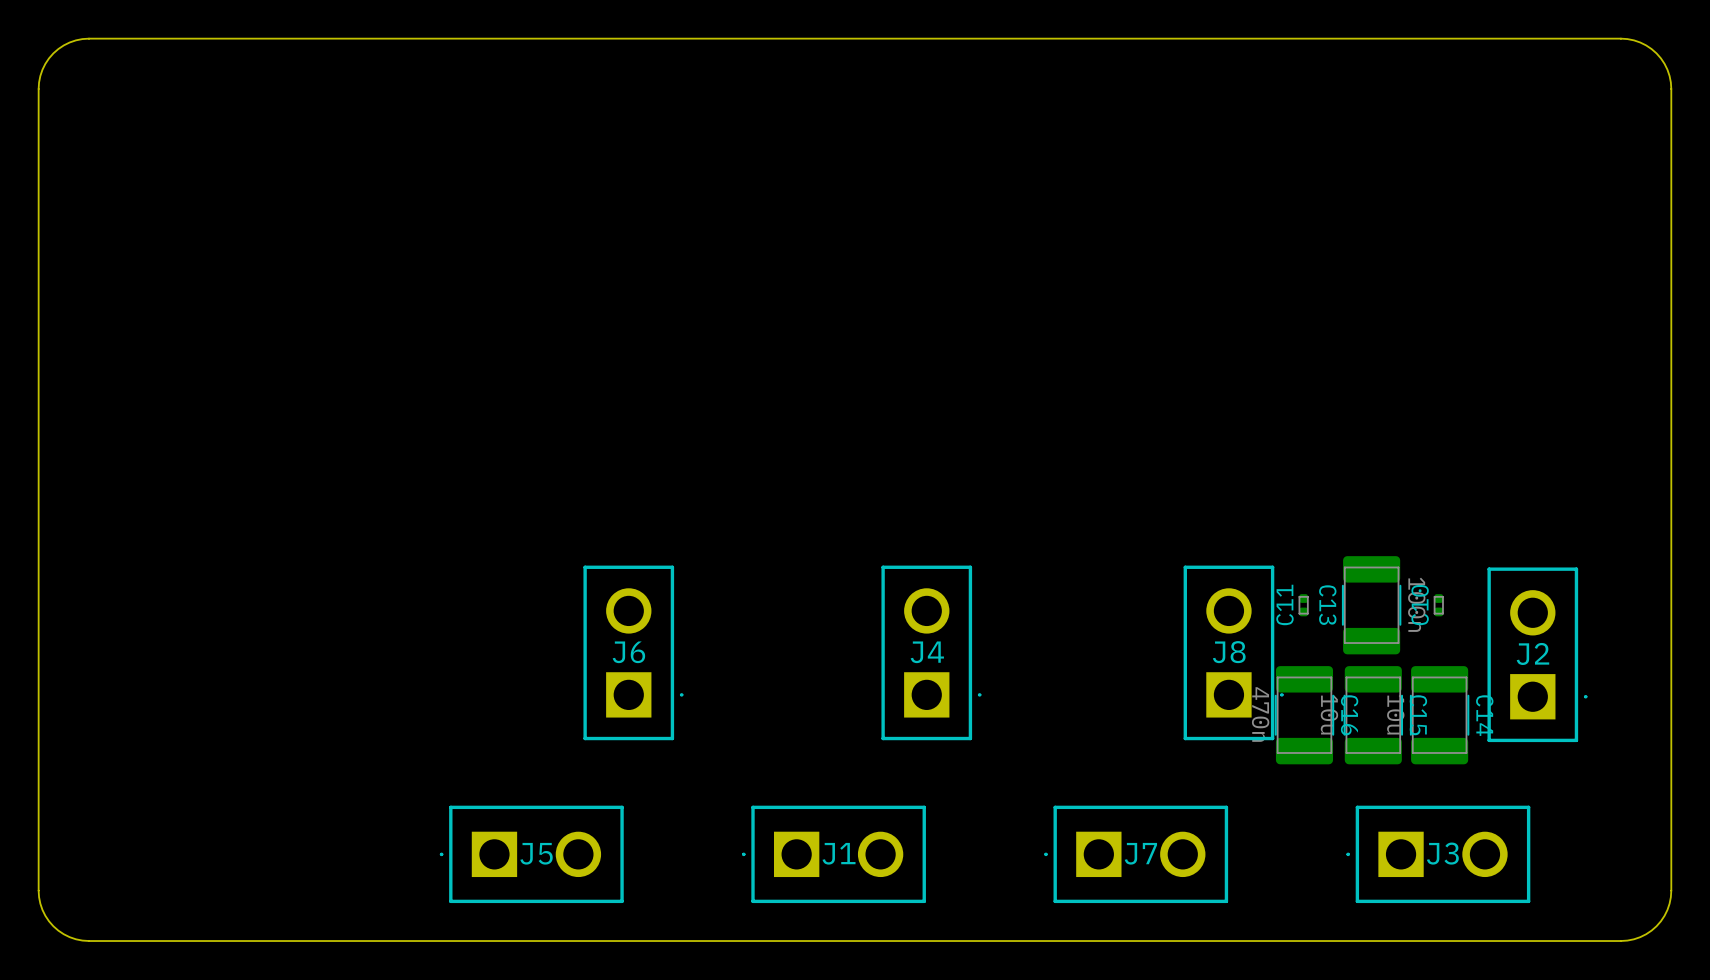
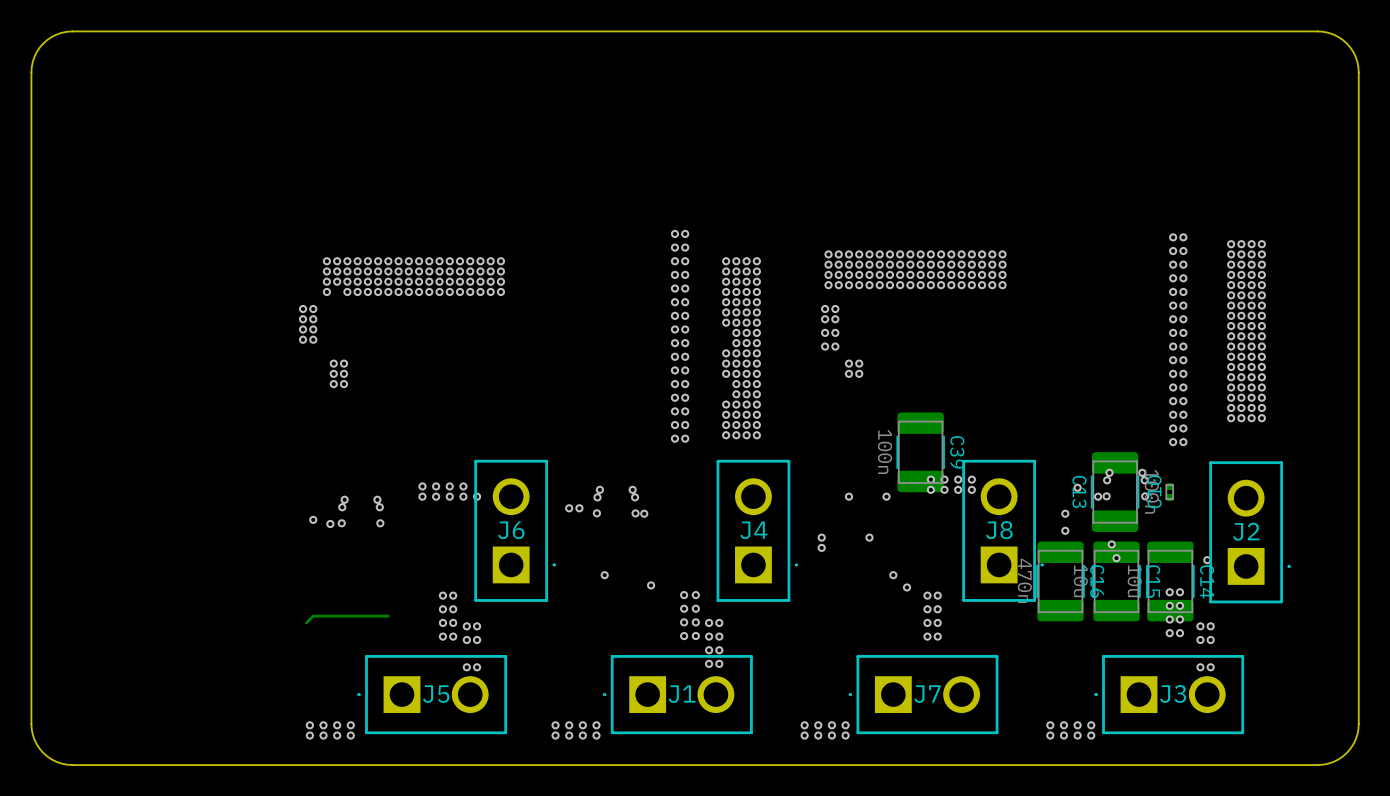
via: none -> (674, 233)
via: none -> (685, 233)
via: none -> (1173, 237)
via: none -> (1183, 237)
via: none -> (1231, 244)
via: none -> (1241, 244)
via: none -> (1251, 244)
via: none -> (1261, 244)
via: none -> (674, 247)
via: none -> (685, 247)
via: none -> (1173, 251)
via: none -> (1183, 251)
via: none -> (828, 254)
via: none -> (838, 254)
via: none -> (848, 254)
via: none -> (859, 254)
via: none -> (869, 254)
via: none -> (879, 254)
via: none -> (889, 254)
via: none -> (900, 254)
via: none -> (910, 254)
via: none -> (920, 254)
via: none -> (930, 254)
via: none -> (941, 254)
via: none -> (951, 254)
via: none -> (961, 254)
via: none -> (971, 254)
via: none -> (982, 254)
via: none -> (992, 254)
via: none -> (1002, 254)
via: none -> (1231, 254)
via: none -> (1241, 254)
via: none -> (1251, 254)
via: none -> (1261, 254)
via: none -> (326, 261)
via: none -> (337, 261)
via: none -> (347, 261)
via: none -> (357, 261)
via: none -> (367, 261)
via: none -> (378, 261)
via: none -> (388, 261)
via: none -> (398, 261)
via: none -> (408, 261)
via: none -> (419, 261)
via: none -> (429, 261)
via: none -> (439, 261)
via: none -> (449, 261)
via: none -> (460, 261)
via: none -> (470, 261)
via: none -> (480, 261)
via: none -> (490, 261)
via: none -> (500, 261)
via: none -> (674, 261)
via: none -> (685, 261)
via: none -> (726, 261)
via: none -> (736, 261)
via: none -> (746, 261)
via: none -> (756, 261)
via: none -> (828, 264)
via: none -> (838, 264)
via: none -> (848, 264)
via: none -> (859, 264)
via: none -> (869, 264)
via: none -> (879, 264)
via: none -> (889, 264)
via: none -> (900, 264)
via: none -> (910, 264)
via: none -> (920, 264)
via: none -> (930, 264)
via: none -> (941, 264)
via: none -> (951, 264)
via: none -> (961, 264)
via: none -> (971, 264)
via: none -> (982, 264)
via: none -> (992, 264)
via: none -> (1002, 264)
via: none -> (1173, 264)
via: none -> (1183, 264)
via: none -> (1231, 264)
via: none -> (1241, 264)
via: none -> (1251, 264)
via: none -> (1261, 264)
via: none -> (326, 271)
via: none -> (337, 271)
via: none -> (347, 271)
via: none -> (357, 271)
via: none -> (367, 271)
via: none -> (378, 271)
via: none -> (388, 271)
via: none -> (398, 271)
via: none -> (408, 271)
via: none -> (419, 271)
via: none -> (429, 271)
via: none -> (439, 271)
via: none -> (449, 271)
via: none -> (460, 271)
via: none -> (470, 271)
via: none -> (480, 271)
via: none -> (490, 271)
via: none -> (500, 271)
via: none -> (726, 271)
via: none -> (736, 271)
via: none -> (746, 271)
via: none -> (756, 271)
via: none -> (674, 274)
via: none -> (685, 274)
via: none -> (828, 274)
via: none -> (838, 274)
via: none -> (848, 274)
via: none -> (859, 274)
via: none -> (869, 274)
via: none -> (879, 274)
via: none -> (889, 274)
via: none -> (900, 274)
via: none -> (910, 274)
via: none -> (920, 274)
via: none -> (930, 274)
via: none -> (941, 274)
via: none -> (951, 274)
via: none -> (961, 274)
via: none -> (971, 274)
via: none -> (982, 274)
via: none -> (992, 274)
via: none -> (1002, 274)
via: none -> (1231, 274)
via: none -> (1241, 274)
via: none -> (1251, 274)
via: none -> (1261, 274)
via: none -> (1173, 278)
via: none -> (1183, 278)
via: none -> (326, 281)
via: none -> (337, 281)
via: none -> (347, 281)
via: none -> (357, 281)
via: none -> (367, 281)
via: none -> (378, 281)
via: none -> (388, 281)
via: none -> (398, 281)
via: none -> (408, 281)
via: none -> (419, 281)
via: none -> (429, 281)
via: none -> (439, 281)
via: none -> (449, 281)
via: none -> (460, 281)
via: none -> (470, 281)
via: none -> (480, 281)
via: none -> (490, 281)
via: none -> (500, 281)
via: none -> (726, 281)
via: none -> (736, 281)
via: none -> (746, 281)
via: none -> (756, 281)
via: none -> (828, 285)
via: none -> (838, 285)
via: none -> (848, 285)
via: none -> (859, 285)
via: none -> (869, 285)
via: none -> (879, 285)
via: none -> (889, 285)
via: none -> (900, 285)
via: none -> (910, 285)
via: none -> (920, 285)
via: none -> (930, 285)
via: none -> (941, 285)
via: none -> (951, 285)
via: none -> (961, 285)
via: none -> (971, 285)
via: none -> (982, 285)
via: none -> (992, 285)
via: none -> (1002, 285)
via: none -> (1231, 285)
via: none -> (1241, 285)
via: none -> (1251, 285)
via: none -> (1261, 285)
via: none -> (674, 288)
via: none -> (685, 288)
via: none -> (326, 291)
via: none -> (347, 291)
via: none -> (357, 291)
via: none -> (367, 291)
via: none -> (378, 291)
via: none -> (388, 291)
via: none -> (398, 291)
via: none -> (408, 291)
via: none -> (419, 291)
via: none -> (429, 291)
via: none -> (439, 291)
via: none -> (449, 291)
via: none -> (460, 291)
via: none -> (470, 291)
via: none -> (480, 291)
via: none -> (490, 291)
via: none -> (500, 291)
via: none -> (726, 291)
via: none -> (736, 291)
via: none -> (746, 291)
via: none -> (756, 291)
via: none -> (1173, 291)
via: none -> (1183, 291)
via: none -> (1231, 295)
via: none -> (1241, 295)
via: none -> (1251, 295)
via: none -> (1261, 295)
via: none -> (674, 302)
via: none -> (685, 302)
via: none -> (726, 302)
via: none -> (736, 302)
via: none -> (746, 302)
via: none -> (756, 302)
via: none -> (1173, 305)
via: none -> (1183, 305)
via: none -> (1231, 305)
via: none -> (1241, 305)
via: none -> (1251, 305)
via: none -> (1261, 305)
via: none -> (303, 309)
via: none -> (313, 309)
via: none -> (825, 309)
via: none -> (835, 309)
via: none -> (726, 312)
via: none -> (736, 312)
via: none -> (746, 312)
via: none -> (756, 312)
via: none -> (674, 315)
via: none -> (685, 315)
via: none -> (1231, 315)
via: none -> (1241, 315)
via: none -> (1251, 315)
via: none -> (1261, 315)
via: none -> (303, 319)
via: none -> (313, 319)
via: none -> (825, 319)
via: none -> (835, 319)
via: none -> (1173, 319)
via: none -> (1183, 319)
via: none -> (726, 322)
via: none -> (736, 322)
via: none -> (746, 322)
via: none -> (756, 322)
via: none -> (1231, 326)
via: none -> (1241, 326)
via: none -> (1251, 326)
via: none -> (1261, 326)
via: none -> (303, 329)
via: none -> (313, 329)
via: none -> (674, 329)
via: none -> (685, 329)
via: none -> (736, 332)
via: none -> (746, 332)
via: none -> (756, 332)
via: none -> (825, 332)
via: none -> (835, 332)
via: none -> (1173, 332)
via: none -> (1183, 332)
via: none -> (1231, 336)
via: none -> (1241, 336)
via: none -> (1251, 336)
via: none -> (1261, 336)
via: none -> (303, 339)
via: none -> (313, 339)
via: none -> (674, 343)
via: none -> (685, 343)
via: none -> (736, 343)
via: none -> (746, 343)
via: none -> (756, 343)
via: none -> (825, 346)
via: none -> (835, 346)
via: none -> (1173, 346)
via: none -> (1183, 346)
via: none -> (1231, 346)
via: none -> (1241, 346)
via: none -> (1251, 346)
via: none -> (1261, 346)
via: none -> (726, 353)
via: none -> (736, 353)
via: none -> (746, 353)
via: none -> (756, 353)
via: none -> (674, 356)
via: none -> (685, 356)
via: none -> (1231, 356)
via: none -> (1241, 356)
via: none -> (1251, 356)
via: none -> (1261, 356)
via: none -> (1173, 360)
via: none -> (1183, 360)
via: none -> (333, 363)
via: none -> (343, 363)
via: none -> (726, 363)
via: none -> (736, 363)
via: none -> (746, 363)
via: none -> (756, 363)
via: none -> (848, 363)
via: none -> (859, 363)
via: none -> (1231, 367)
via: none -> (1241, 367)
via: none -> (1251, 367)
via: none -> (1261, 367)
via: none -> (674, 370)
via: none -> (685, 370)
via: none -> (333, 373)
via: none -> (343, 373)
via: none -> (726, 373)
via: none -> (736, 373)
via: none -> (746, 373)
via: none -> (756, 373)
via: none -> (848, 373)
via: none -> (859, 373)
via: none -> (1173, 373)
via: none -> (1183, 373)
via: none -> (1231, 377)
via: none -> (1241, 377)
via: none -> (1251, 377)
via: none -> (1261, 377)
via: none -> (333, 384)
via: none -> (343, 384)
via: none -> (674, 384)
via: none -> (685, 384)
via: none -> (736, 384)
via: none -> (746, 384)
via: none -> (756, 384)
via: none -> (1173, 387)
via: none -> (1183, 387)
via: none -> (1231, 387)
via: none -> (1241, 387)
via: none -> (1251, 387)
via: none -> (1261, 387)
via: none -> (736, 394)
via: none -> (746, 394)
via: none -> (756, 394)
via: none -> (674, 397)
via: none -> (685, 397)
via: none -> (1231, 397)
via: none -> (1241, 397)
via: none -> (1251, 397)
via: none -> (1261, 397)
via: none -> (1173, 401)
via: none -> (1183, 401)
via: none -> (726, 404)
via: none -> (736, 404)
via: none -> (746, 404)
via: none -> (756, 404)
via: none -> (1231, 407)
via: none -> (1241, 407)
via: none -> (1251, 407)
via: none -> (1261, 407)
via: none -> (674, 411)
via: none -> (685, 411)
via: none -> (726, 414)
via: none -> (736, 414)
via: none -> (746, 414)
via: none -> (756, 414)
via: none -> (1173, 414)
via: none -> (1183, 414)
via: none -> (1231, 418)
via: none -> (1241, 418)
via: none -> (1251, 418)
via: none -> (1261, 418)
via: none -> (674, 425)
via: none -> (685, 425)
via: none -> (726, 425)
via: none -> (736, 425)
via: none -> (746, 425)
via: none -> (756, 425)
via: none -> (1173, 428)
via: none -> (1183, 428)
via: none -> (726, 435)
via: none -> (736, 435)
via: none -> (746, 435)
via: none -> (756, 435)
via: none -> (674, 438)
via: none -> (685, 438)
via: none -> (1173, 442)
via: none -> (1183, 442)
C39: none -> 100n (920, 452)
via: none -> (1109, 472)
via: none -> (1142, 472)
via: none -> (930, 479)
via: none -> (944, 479)
via: none -> (958, 479)
via: none -> (971, 479)
via: none -> (1107, 480)
via: none -> (1144, 480)
via: none -> (422, 486)
via: none -> (436, 486)
via: none -> (449, 486)
via: none -> (463, 486)
via: none -> (1077, 487)
via: none -> (599, 489)
via: none -> (632, 489)
via: none -> (930, 489)
via: none -> (944, 489)
via: none -> (958, 489)
via: none -> (971, 489)
C11: (1303, 605) -> none
via: none -> (422, 496)
via: none -> (436, 496)
via: none -> (449, 496)
via: none -> (463, 496)
via: none -> (477, 496)
via: none -> (848, 496)
via: none -> (886, 496)
via: none -> (1098, 496)
via: none -> (1106, 496)
via: none -> (1145, 496)
via: none -> (597, 497)
via: none -> (635, 497)
via: none -> (344, 499)
via: none -> (377, 499)
via: none -> (342, 507)
via: none -> (379, 507)
via: none -> (569, 508)
via: none -> (579, 508)
via: none -> (596, 513)
via: none -> (635, 513)
via: none -> (644, 513)
via: none -> (1065, 513)
via: none -> (313, 519)
via: none -> (341, 523)
via: none -> (380, 523)
via: none -> (330, 523)
via: none -> (1065, 530)
via: none -> (821, 537)
via: none -> (869, 537)
via: none -> (1111, 544)
via: none -> (821, 547)
via: none -> (1116, 558)
via: none -> (1207, 560)
via: none -> (604, 575)
via: none -> (893, 575)
via: none -> (651, 585)
via: none -> (906, 587)
via: none -> (1169, 592)
via: none -> (1179, 592)
via: none -> (684, 595)
via: none -> (695, 595)
via: none -> (442, 595)
via: none -> (453, 595)
via: none -> (927, 595)
via: none -> (937, 595)
via: none -> (1169, 605)
via: none -> (1179, 605)
via: none -> (684, 608)
via: none -> (695, 608)
via: none -> (442, 609)
via: none -> (453, 609)
via: none -> (927, 609)
via: none -> (937, 609)
track: none -> (388, 616) (313, 616) (306, 622)
via: none -> (1169, 619)
via: none -> (1179, 619)
via: none -> (684, 622)
via: none -> (695, 622)
via: none -> (442, 622)
via: none -> (453, 622)
via: none -> (709, 622)
via: none -> (719, 622)
via: none -> (927, 622)
via: none -> (937, 622)
via: none -> (466, 626)
via: none -> (477, 626)
via: none -> (1200, 626)
via: none -> (1210, 626)
via: none -> (1169, 633)
via: none -> (1179, 633)
via: none -> (684, 636)
via: none -> (695, 636)
via: none -> (442, 636)
via: none -> (453, 636)
via: none -> (709, 636)
via: none -> (719, 636)
via: none -> (927, 636)
via: none -> (937, 636)
via: none -> (466, 640)
via: none -> (477, 640)
via: none -> (1200, 640)
via: none -> (1210, 640)
via: none -> (709, 650)
via: none -> (719, 650)
via: none -> (709, 663)
via: none -> (719, 663)
via: none -> (466, 667)
via: none -> (477, 667)
via: none -> (1200, 667)
via: none -> (1210, 667)
via: none -> (309, 725)
via: none -> (323, 725)
via: none -> (337, 725)
via: none -> (350, 725)
via: none -> (555, 725)
via: none -> (569, 725)
via: none -> (582, 725)
via: none -> (596, 725)
via: none -> (804, 725)
via: none -> (818, 725)
via: none -> (831, 725)
via: none -> (845, 725)
via: none -> (1050, 725)
via: none -> (1063, 725)
via: none -> (1077, 725)
via: none -> (1091, 725)
via: none -> (309, 735)
via: none -> (323, 735)
via: none -> (337, 735)
via: none -> (350, 735)
via: none -> (555, 735)
via: none -> (569, 735)
via: none -> (582, 735)
via: none -> (596, 735)
via: none -> (804, 735)
via: none -> (818, 735)
via: none -> (831, 735)
via: none -> (845, 735)
via: none -> (1050, 735)
via: none -> (1063, 735)
via: none -> (1077, 735)
via: none -> (1091, 735)

